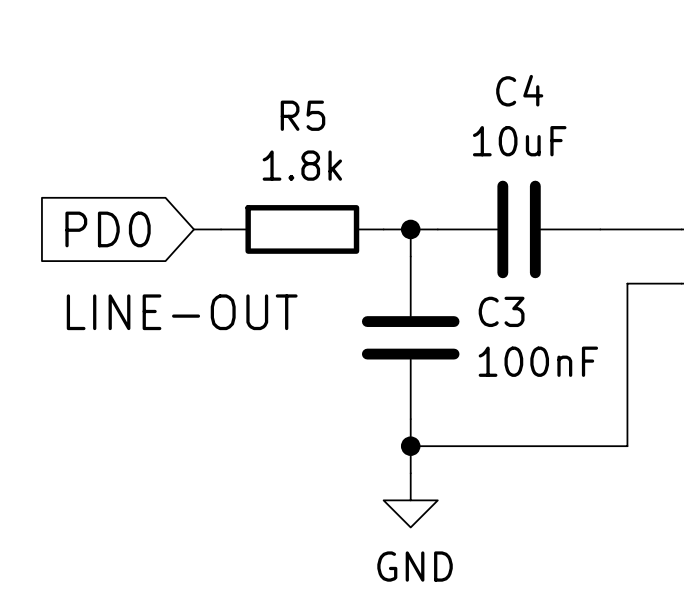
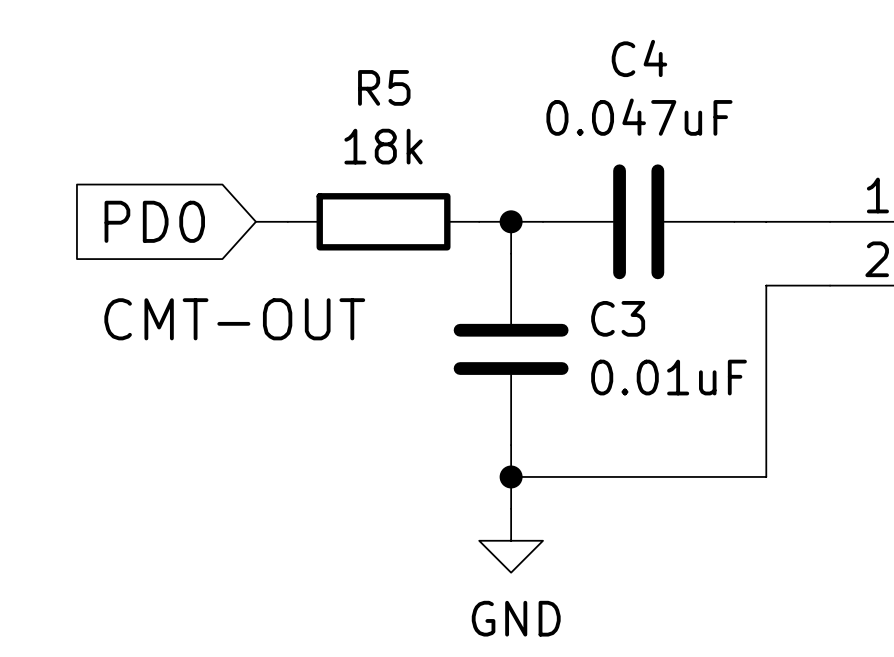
C4 value: 10uF (519, 141) -> 0.047uF (639, 117)
R5 value: 1.8k (302, 165) -> 18k (383, 146)
text: LINE-OUT (182, 312) -> CMT-OUT (234, 319)
C3 value: 100nF (538, 361) -> 0.01uF (669, 377)

